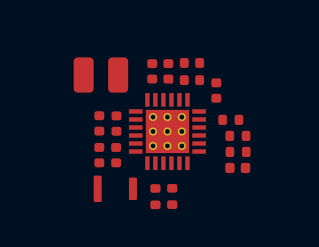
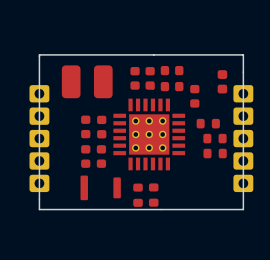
board edge: none -> (243, 54) (243, 209) (39, 209) (39, 54) (243, 54)
part: none -> (39, 138)
part: none -> (243, 138)
part rotation: 0° (237, 167) -> 90° clockwise (222, 81)
part position: (237, 167) -> (222, 81)

